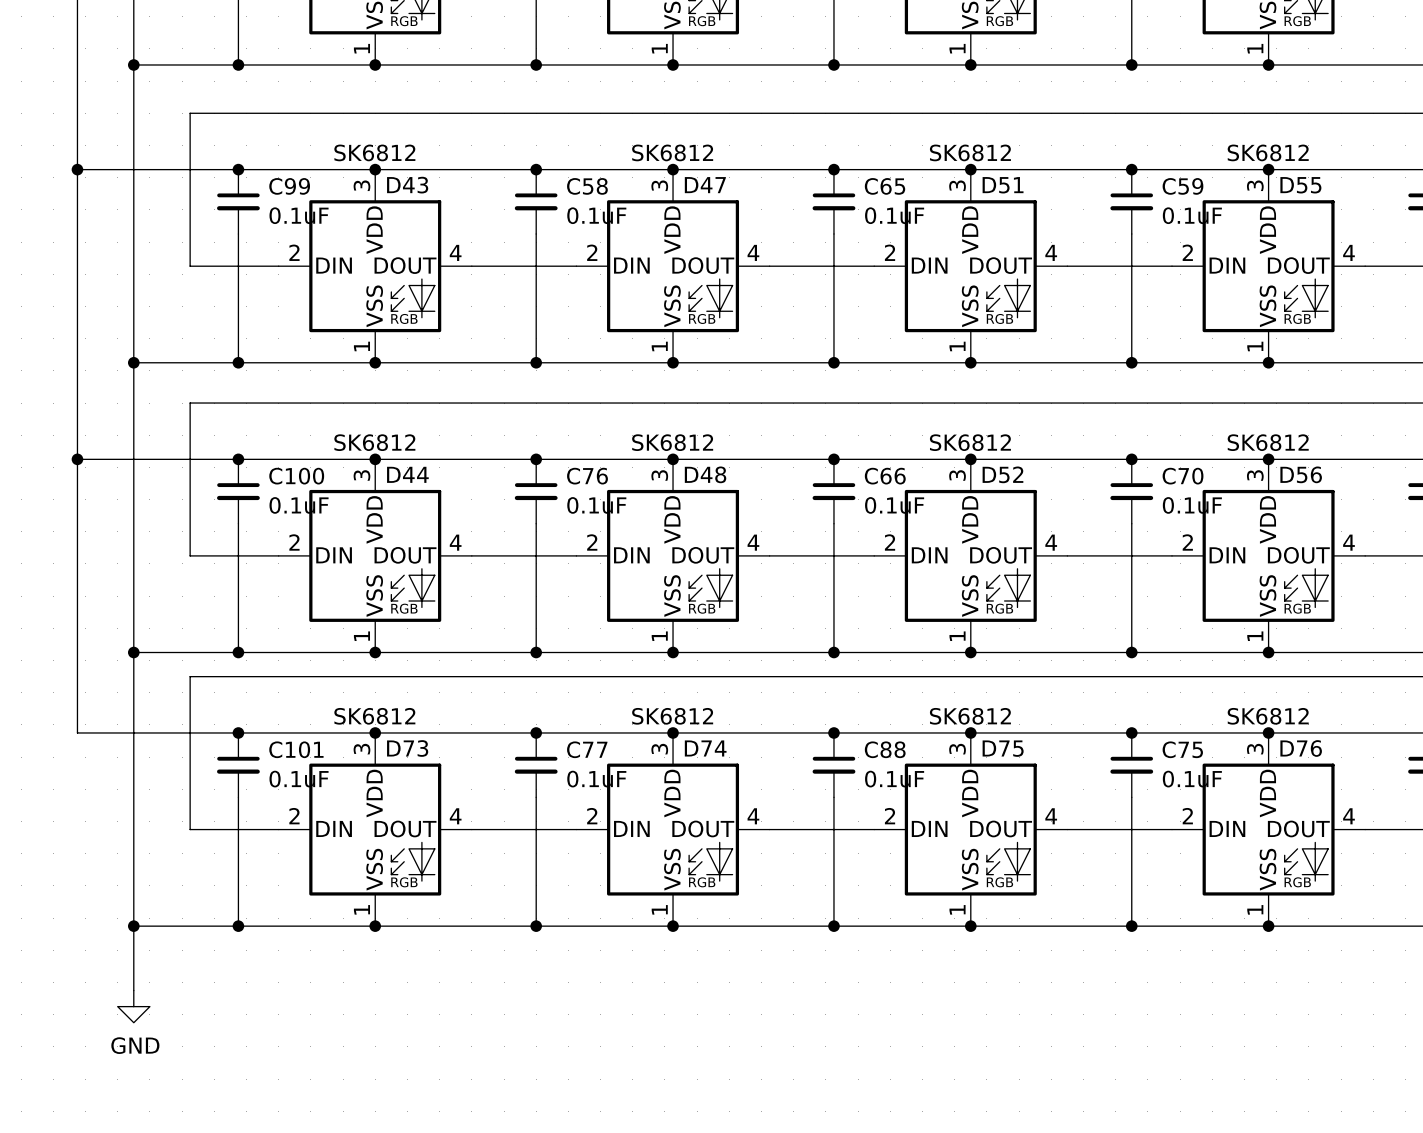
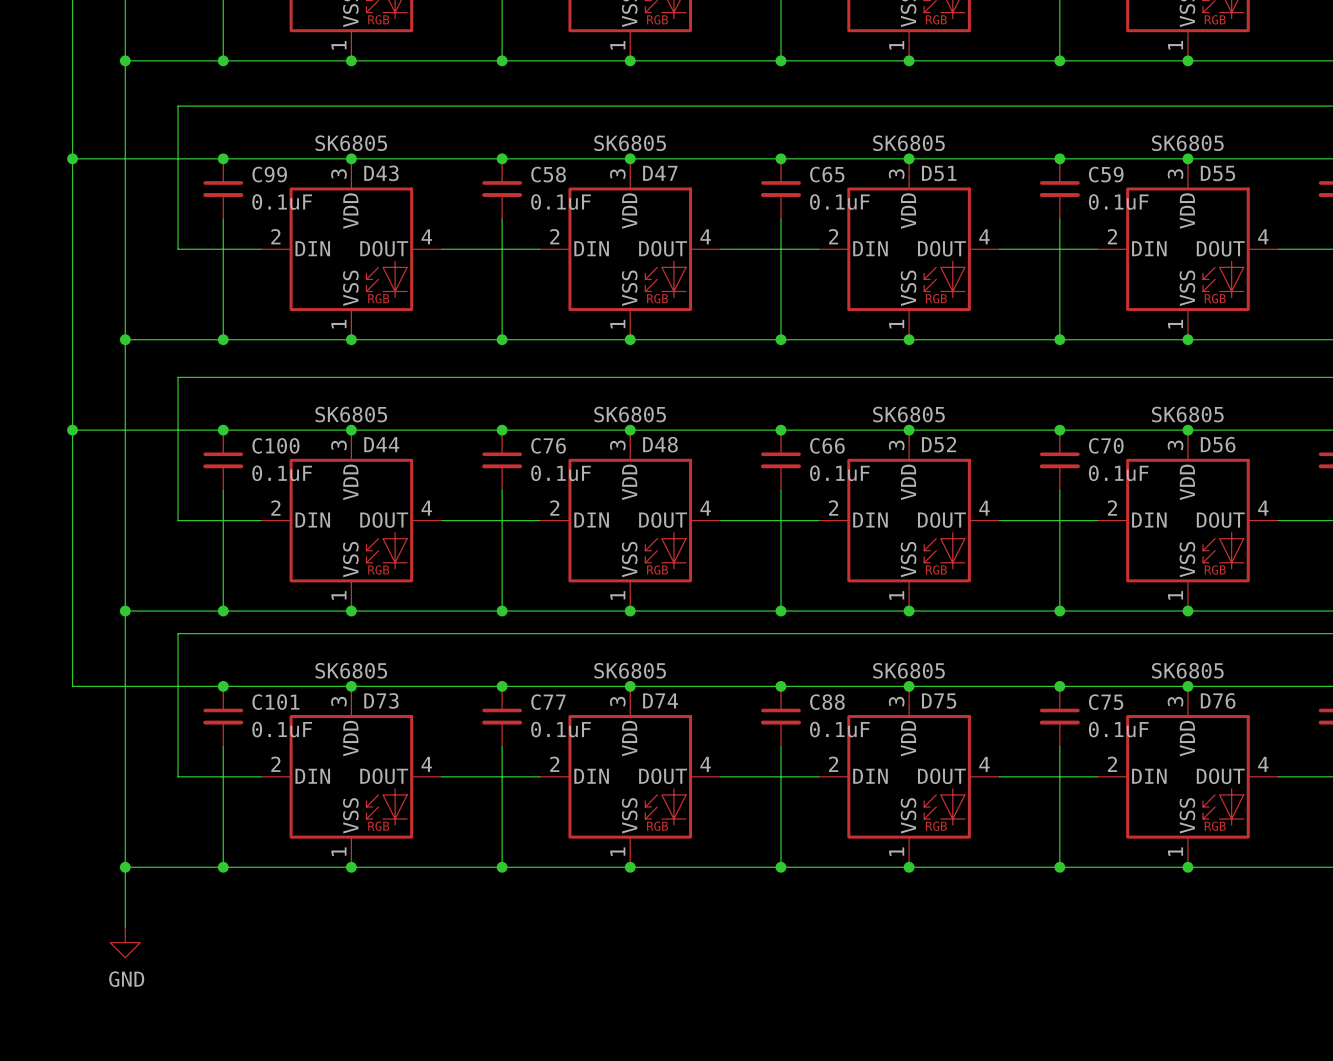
D43 value: SK6812 (374, 152) -> SK6805 (351, 143)
D47 value: SK6812 (672, 152) -> SK6805 (630, 143)
D51 value: SK6812 (970, 152) -> SK6805 (908, 143)
D55 value: SK6812 (1268, 152) -> SK6805 (1187, 143)
D44 value: SK6812 (374, 442) -> SK6805 (351, 414)
D48 value: SK6812 (672, 442) -> SK6805 (630, 414)
D52 value: SK6812 (970, 442) -> SK6805 (908, 414)
D56 value: SK6812 (1268, 442) -> SK6805 (1187, 414)
D73 value: SK6812 (374, 716) -> SK6805 (351, 670)
D74 value: SK6812 (672, 716) -> SK6805 (630, 670)
D75 value: SK6812 (970, 716) -> SK6805 (908, 670)
D76 value: SK6812 (1268, 716) -> SK6805 (1187, 670)

